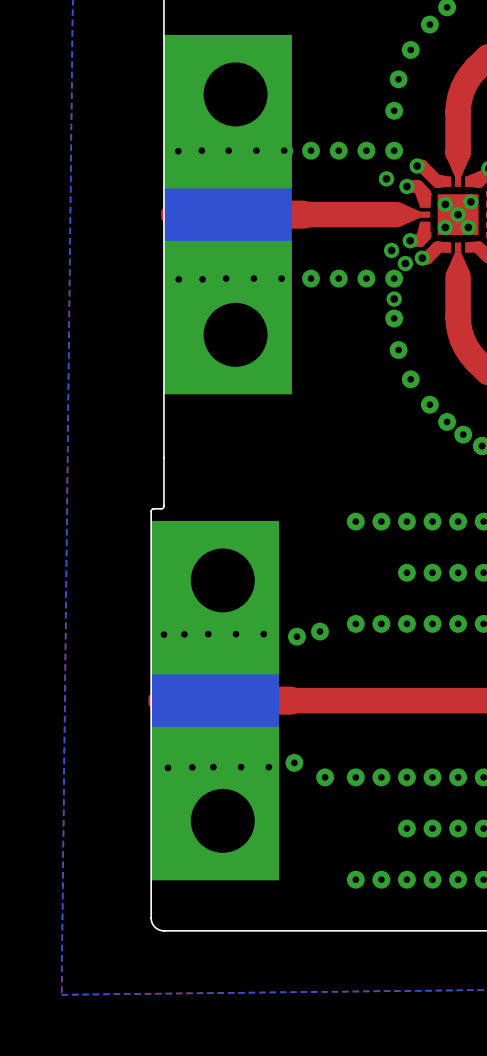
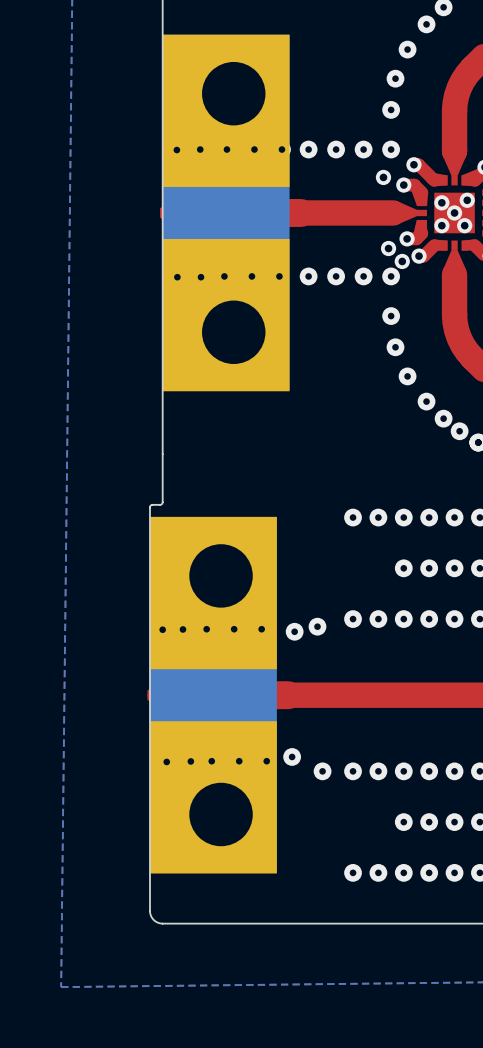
via: (394, 299) -> none

